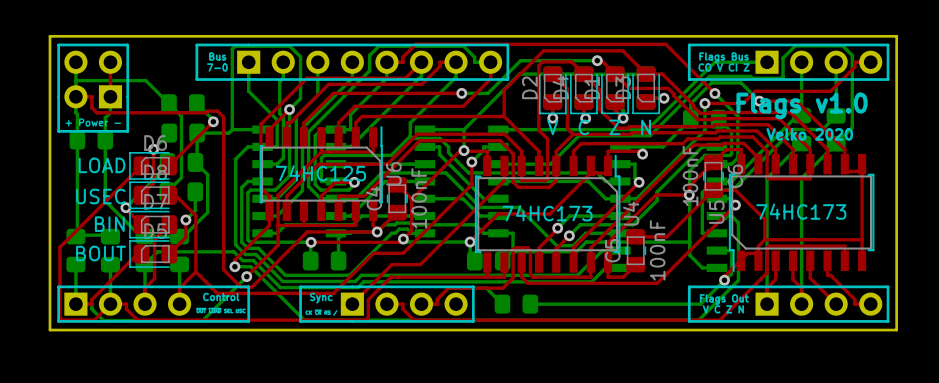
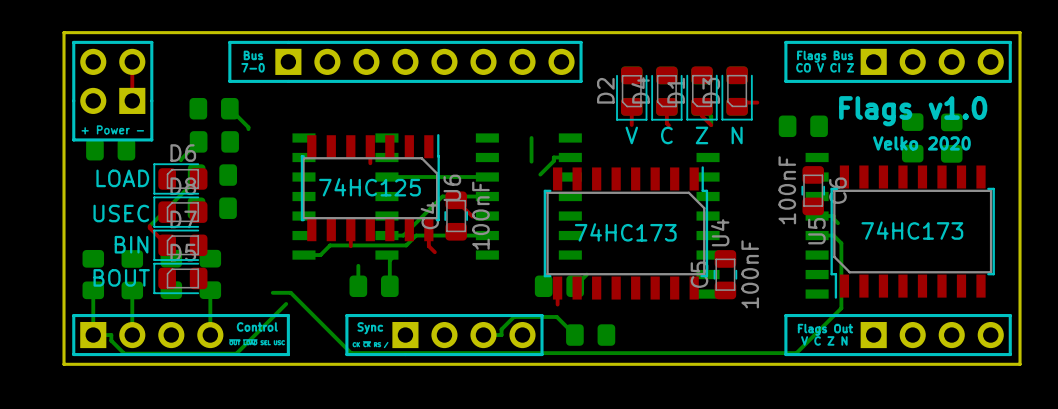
bottom track: (597, 60) (520, 60) (488, 93) (461, 93) -> none
top track: (597, 60) (601, 60) (629, 88) (668, 88) (697, 119) (779, 118) (810, 149) (810, 178) (769, 178) (767, 176) (767, 151) (752, 137) (687, 138) (682, 143) (581, 143) (573, 151) (573, 165) -> none
via: (597, 60) -> none
bottom track: (75, 62) (77, 235) -> none
bottom track: (248, 62) (248, 91) (277, 119) (277, 146) (247, 146) (235, 159) (235, 244) (245, 254) (255, 254) (282, 281) (355, 281) (361, 275) (577, 275) (602, 250) (620, 250) -> none
bottom track: (283, 62) (283, 78) (279, 81) (279, 113) (283, 117) (283, 157) (277, 164) (262, 164) -> none
bottom track: (317, 62) (317, 95) (296, 116) (296, 179) (277, 198) (262, 198) -> none
bottom track: (352, 62) (352, 78) (302, 128) (302, 190) (277, 216) (262, 216) -> none
bottom track: (386, 62) (386, 78) (350, 114) (350, 129) (321, 129) (315, 135) (315, 184) (320, 190) (348, 190) (354, 182) -> none
top track: (386, 62) (402, 62) (402, 57) (415, 44) (665, 44) (714, 93) -> none
bottom track: (421, 62) (421, 78) (419, 78) (350, 146) (335, 146) -> none
top track: (421, 62) (405, 78) (306, 78) (260, 124) (260, 187) (269, 196) (269, 225) (234, 260) (234, 266) -> none
bottom track: (456, 62) (456, 78) (410, 122) (410, 136) -> none
top track: (456, 62) (440, 62) (440, 66) (421, 84) (328, 84) (290, 122) (286, 122) (286, 137) -> none
bottom track: (490, 62) (474, 62) (474, 57) (463, 46) (378, 46) (369, 55) (369, 70) (308, 131) (308, 186) (320, 198) (355, 198) (381, 172) (445, 172) (480, 207) (518, 207) (556, 245) (573, 245) (585, 233) (620, 233) -> none
top track: (490, 62) (490, 79) (463, 106) (354, 106) (338, 122) (338, 137) -> none
bottom track: (767, 62) (714, 62) (647, 129) (498, 129) -> none
bottom track: (801, 62) (801, 115) (797, 115) (731, 181) (716, 181) -> none
bottom track: (836, 62) (836, 115) (822, 129) (793, 129) (732, 189) (705, 189) (702, 192) (702, 233) (716, 233) -> none
top track: (870, 62) (854, 62) (854, 67) (830, 91) (755, 91) (743, 103) (704, 103) -> none
top track: (552, 74) (567, 88) (567, 128) (573, 134) -> none
bottom track: (646, 74) (519, 74) (464, 129) (424, 129) -> none
bottom track: (75, 80) (145, 80) (181, 116) (181, 177) (167, 191) -> none
top track: (461, 93) (333, 93) (303, 122) (303, 137) -> none
via: (461, 93) -> none
bottom track: (714, 93) (737, 116) (737, 157) (731, 164) (716, 164) -> none
via: (714, 93) -> none
top track: (75, 96) (91, 96) (91, 107) (96, 112) (217, 111) (223, 117) (223, 269) (240, 286) (252, 286) (307, 231) (377, 231) (397, 212) -> none
bottom track: (110, 96) (110, 112) (105, 117) (105, 201) (140, 236) (183, 236) (207, 212) (207, 174) (195, 162) (197, 160) (197, 133) (228, 133) (232, 129) -> none
via: (664, 98) -> none
bottom track: (759, 101) (741, 82) (711, 82) (690, 103) (690, 119) (663, 146) (620, 146) -> none
top track: (759, 101) (796, 101) (844, 149) (844, 171) (862, 171) -> none
via: (759, 101) -> none
bottom track: (704, 103) (704, 130) (636, 198) (605, 198) (588, 181) (498, 181) -> none
via: (704, 103) -> none
top track: (289, 109) (269, 129) (269, 137) -> none
via: (289, 109) -> none
top track: (504, 116) (362, 116) (355, 122) (355, 137) -> none
top track: (504, 116) (538, 151) (538, 165) -> none
top track: (504, 116) (504, 90) (543, 50) (622, 50) (646, 74) (662, 74) (700, 113) (790, 112) (827, 149) (827, 164) -> none
via: (552, 118) -> none
via: (585, 118) -> none
via: (623, 118) -> none
bottom track: (718, 119) (731, 132) (731, 153) (704, 155) (689, 170) (689, 255) (702, 267) (716, 267) -> none
top track: (213, 121) (169, 165) -> none
via: (213, 121) -> none
bottom track: (232, 129) (262, 129) -> none
bottom track: (232, 129) (232, 49) (235, 46) (289, 46) (300, 56) (300, 98) (289, 109) (289, 175) (275, 190) (250, 190) (247, 192) (247, 239) (250, 242) (311, 242) -> none
top track: (573, 134) (757, 130) (775, 149) (775, 164) -> none
top track: (573, 134) (556, 151) (556, 180) (549, 187) (518, 187) (513, 182) (513, 153) (500, 140) (419, 140) (364, 196) (338, 196) (338, 210) -> none
bottom track: (410, 136) (412, 138) (439, 138) (448, 147) (448, 152) (468, 172) (597, 172) (605, 181) (620, 181) -> none
bottom track: (410, 136) (391, 155) (324, 155) (321, 158) (321, 181) (335, 181) -> none
top track: (373, 137) (373, 152) (321, 152) (278, 195) (278, 245) (246, 276) -> none
bottom track: (801, 143) (767, 178) (767, 304) -> none
bottom track: (424, 146) (439, 146) (439, 154) (483, 198) (498, 198) -> none
bottom track: (716, 146) (702, 146) (657, 192) (657, 200) (632, 224) (580, 224) (569, 235) -> none
top track: (153, 149) (153, 183) (141, 195) -> none
via: (153, 149) -> none
via: (464, 150) -> none
top track: (642, 154) (639, 151) (608, 151) (608, 173) (590, 173) -> none
via: (642, 154) -> none
top track: (471, 162) (471, 184) (403, 253) (373, 253) (333, 293) (217, 293) (195, 271) -> none
via: (471, 162) -> none
bottom track: (498, 164) (550, 164) (579, 135) (650, 135) (709, 76) (781, 78) (783, 58) (795, 45) (842, 45) (852, 55) (852, 127) (801, 178) (801, 304) -> none
bottom track: (620, 164) (634, 164) (634, 178) (639, 182) -> none
top track: (741, 164) (741, 149) (726, 149) (689, 186) (689, 195) (655, 195) (608, 242) (608, 277) (623, 277) (635, 264) -> none
top track: (758, 164) (758, 157) (743, 143) (693, 145) (590, 247) (590, 277) (533, 277) (530, 274) (530, 250) (527, 247) (515, 247) (513, 249) (513, 278) (502, 288) (448, 288) (437, 299) (437, 304) (421, 304) -> none
top track: (792, 164) (792, 149) (768, 124) (618, 128) (599, 108) (599, 89) (571, 61) (542, 61) (538, 65) (538, 130) (547, 138) (547, 178) (545, 180) (521, 180) (521, 151) (504, 134) (417, 134) (387, 164) (318, 164) (286, 196) (286, 210) -> none
top track: (862, 164) (862, 260) -> none
top track: (141, 165) (59, 247) (59, 318) (61, 320) (94, 320) (110, 304) (126, 304) (126, 309) (137, 320) (365, 320) (368, 317) (368, 299) (390, 277) (504, 277) (504, 262) -> none
top track: (487, 165) (487, 151) (459, 151) (411, 199) (411, 230) (400, 242) (311, 242) -> none
top track: (504, 165) (504, 180) (420, 264) (391, 264) (352, 304) -> none
top track: (590, 173) (550, 213) (498, 213) (470, 242) -> none
bottom track: (262, 181) (247, 181) (241, 187) (241, 242) (247, 248) (258, 248) (285, 275) (349, 275) (391, 233) (395, 233) (399, 229) (407, 229) (411, 233) (424, 233) -> none
top track: (354, 182) (335, 182) (321, 196) (321, 210) -> none
via: (354, 182) -> none
top track: (639, 182) (573, 247) (573, 262) -> none
via: (639, 182) -> none
bottom track: (195, 191) (195, 210) (185, 219) -> none
top track: (169, 195) (175, 195) (195, 215) (195, 271) -> none
via: (689, 195) -> none
bottom track: (424, 198) (463, 198) (480, 216) (498, 216) -> none
top track: (735, 205) (657, 283) (527, 283) (521, 277) (521, 262) -> none
via: (735, 205) -> none
via: (125, 207) -> none
top track: (355, 210) (355, 225) (278, 225) -> none
bottom track: (620, 216) (569, 216) (557, 228) -> none
top track: (185, 219) (185, 237) (169, 254) -> none
via: (185, 219) -> none
top track: (169, 224) (154, 239) (154, 278) (145, 288) (145, 304) -> none
top track: (557, 228) (538, 247) (538, 262) -> none
via: (557, 228) -> none
via: (377, 231) -> none
bottom track: (335, 233) (377, 231) (384, 224) (396, 223) (475, 224) (483, 233) (513, 233) (514, 251) (576, 251) (586, 242) (689, 242) -> none
bottom track: (77, 235) (108, 235) (110, 236) -> none
top track: (569, 235) (556, 247) (556, 262) -> none
via: (569, 235) -> none
top track: (635, 236) (666, 236) (713, 190) (735, 190) (764, 219) (764, 239) -> none
bottom track: (403, 239) (406, 242) (470, 242) (470, 256) (474, 260) -> none
via: (403, 239) -> none
top track: (764, 239) (758, 246) (758, 260) -> none
top track: (764, 239) (862, 239) -> none
via: (311, 242) -> none
via: (470, 242) -> none
bottom track: (716, 250) (731, 250) (731, 273) (700, 304) (530, 304) -> none
top track: (758, 253) (747, 253) (724, 276) (724, 280) -> none
top track: (141, 254) (137, 254) (91, 299) (91, 304) (75, 304) -> none
top track: (775, 260) (775, 279) (767, 288) (767, 304) -> none
top track: (792, 260) (792, 279) (801, 288) (801, 304) -> none
top track: (810, 260) (810, 278) (836, 304) -> none
top track: (827, 260) (827, 275) (830, 275) (854, 299) (854, 304) (870, 304) -> none
top track: (844, 260) (844, 246) (768, 246) (767, 247) (767, 272) (719, 320) (413, 320) (402, 309) (402, 304) (386, 304) -> none
via: (234, 266) -> none
bottom track: (620, 267) (605, 267) (591, 281) (363, 281) (357, 287) (280, 287) (253, 260) (242, 260) (233, 251) (157, 251) (145, 264) (145, 304) -> none
top track: (195, 271) (179, 288) (179, 304) -> none
via: (246, 276) -> none
via: (724, 280) -> none

